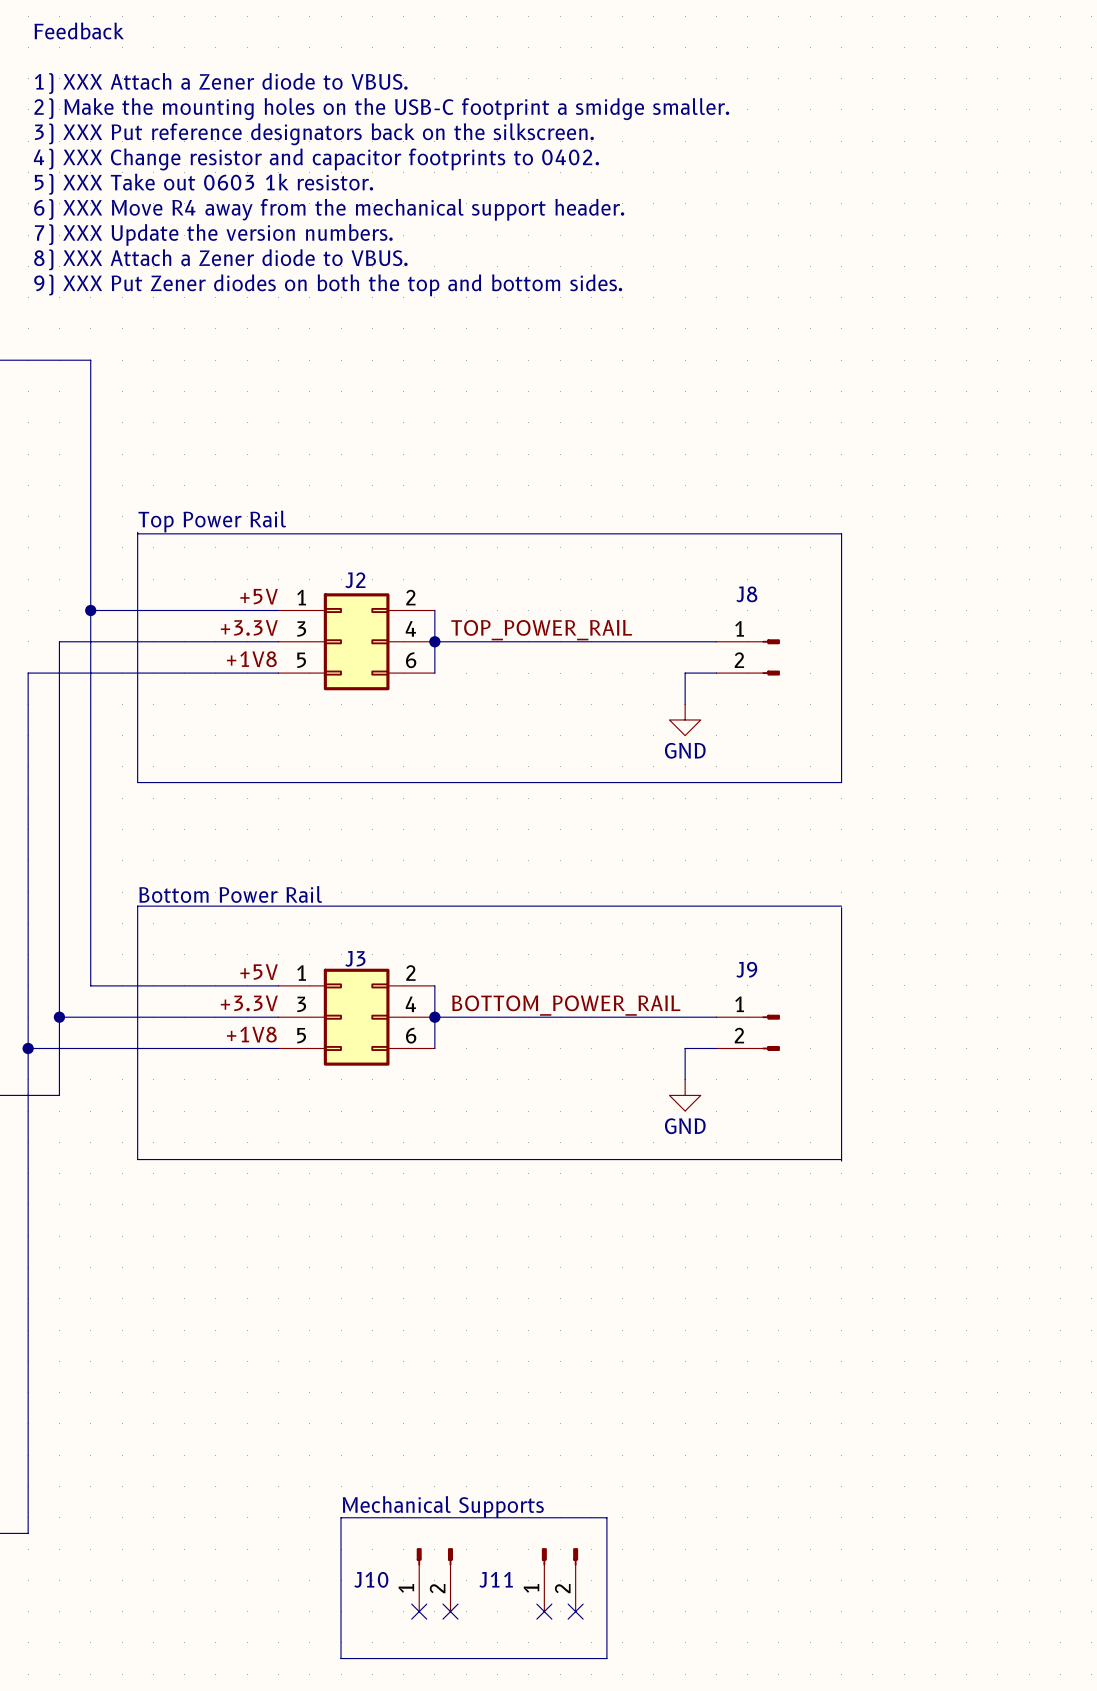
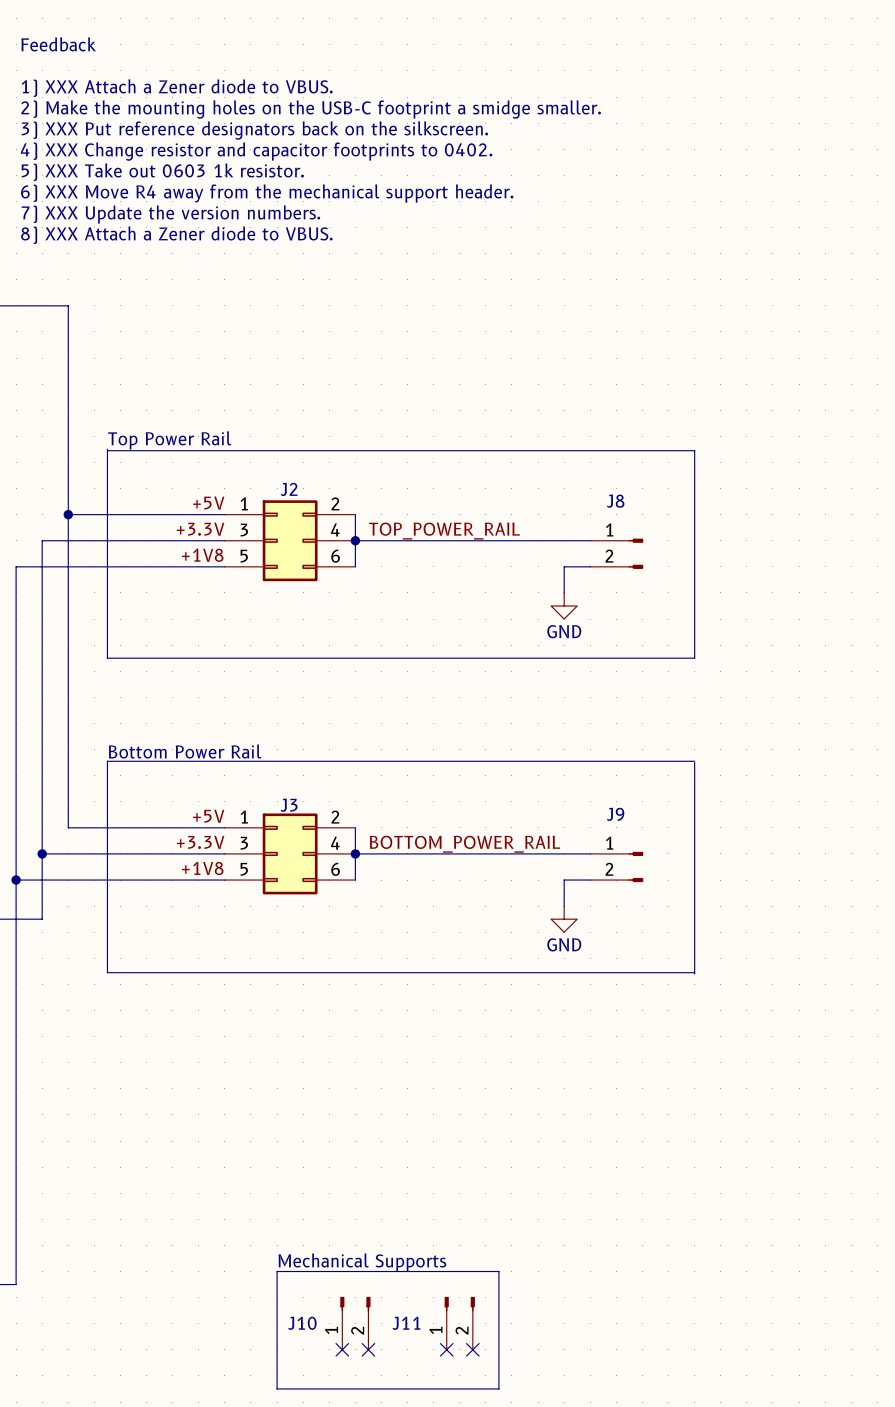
text position: Feedback (79, 30) -> Feedback (58, 44)
text position: 1) XXX Attach a Zener diode to VBUS. (221, 83) -> 1) XXX Attach a Zener diode to VBUS. (177, 88)
text position: 2) Make the mounting holes on the USB-C footprint a smidge smaller. (381, 109) -> 2) Make the mounting holes on the USB-C footprint a smidge smaller. (311, 109)
text position: 3) XXX Put reference designators back on the silkscreen. (314, 134) -> 3) XXX Put reference designators back on the silkscreen. (254, 130)
text position: 4) XXX Change resistor and capacitor footprints to 0402. (316, 159) -> 4) XXX Change resistor and capacitor footprints to 0402. (256, 151)
text position: 5) XXX Take out 0603 1k resistor. (204, 184) -> 5) XXX Take out 0603 1k resistor. (162, 172)
text position: 6) XXX Move R4 away from the mechanical support header. (329, 209) -> 6) XXX Move R4 away from the mechanical support header. (267, 193)
text position: 7) XXX Update the version numbers. (213, 234) -> 7) XXX Update the version numbers. (170, 214)
text position: 8) XXX Attach a Zener diode to VBUS. (220, 259) -> 8) XXX Attach a Zener diode to VBUS. (176, 235)
text: 9) XXX Put Zener diodes on both the top and bottom sides. (328, 285) -> none

